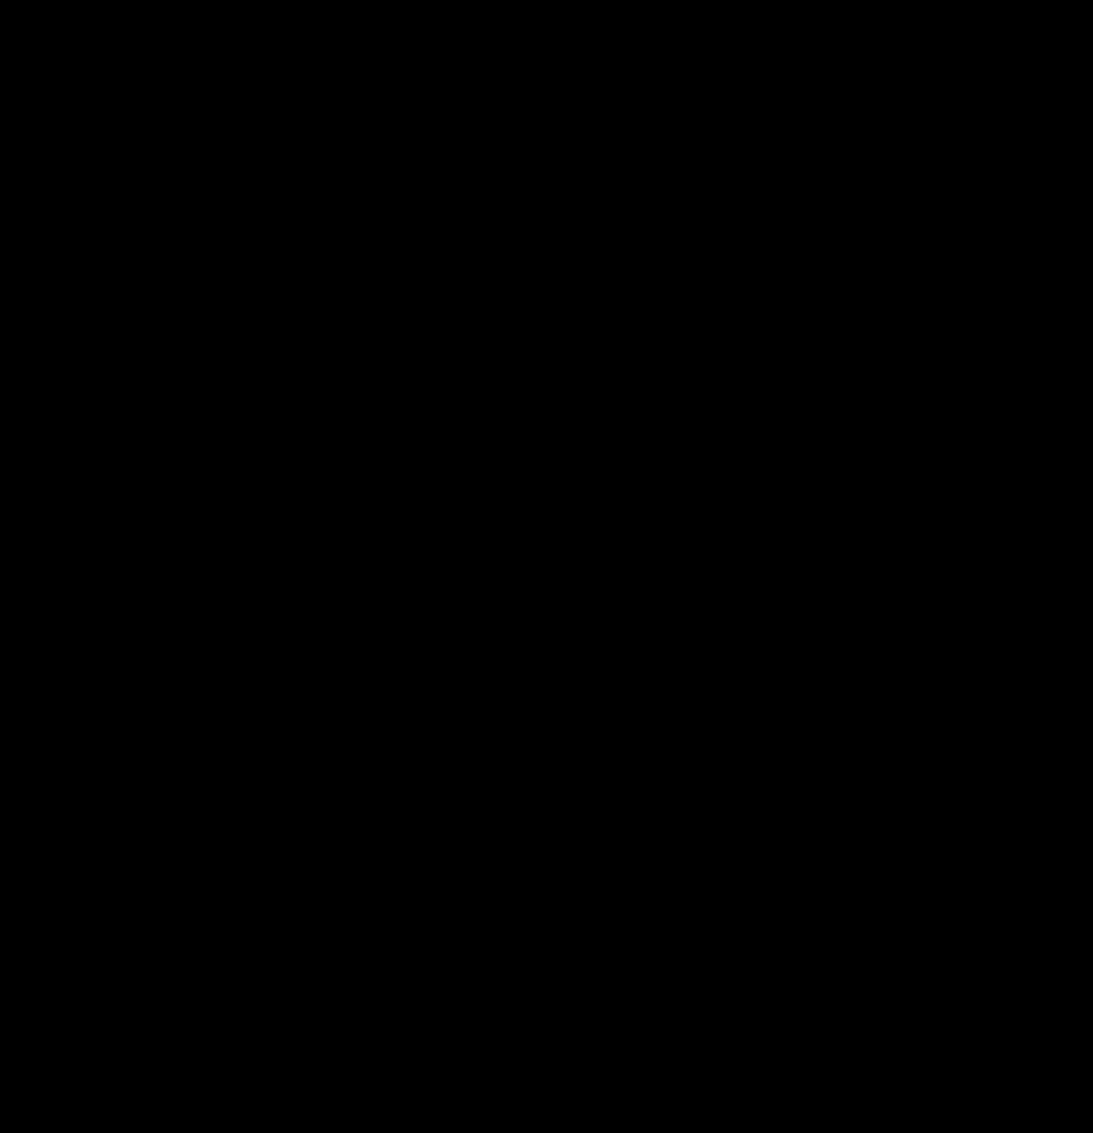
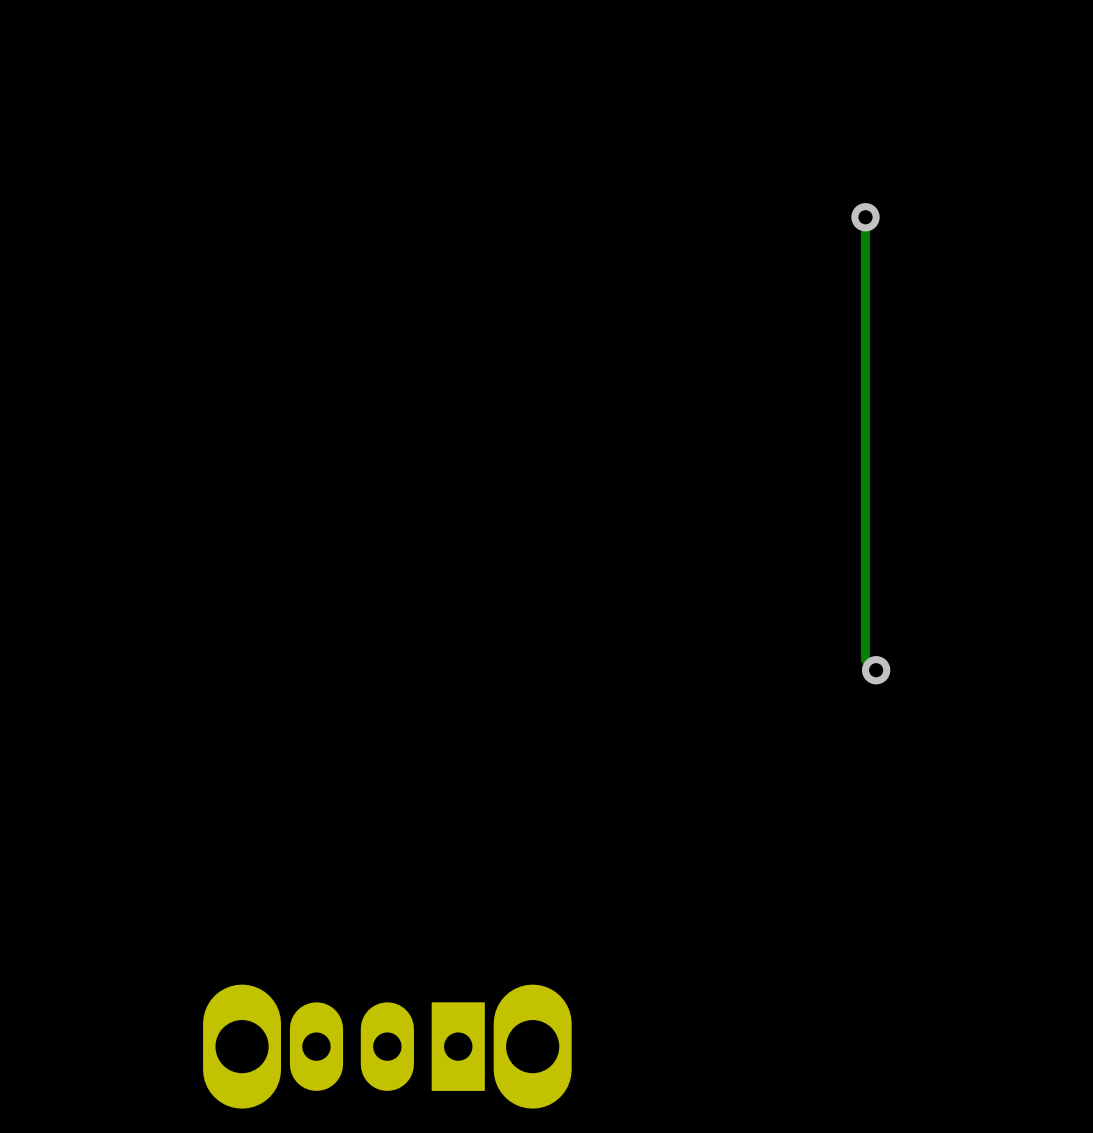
track: none -> (865, 217) (865, 659) (876, 670)
via: none -> (865, 217)
via: none -> (876, 670)
part: none -> (387, 1046)

